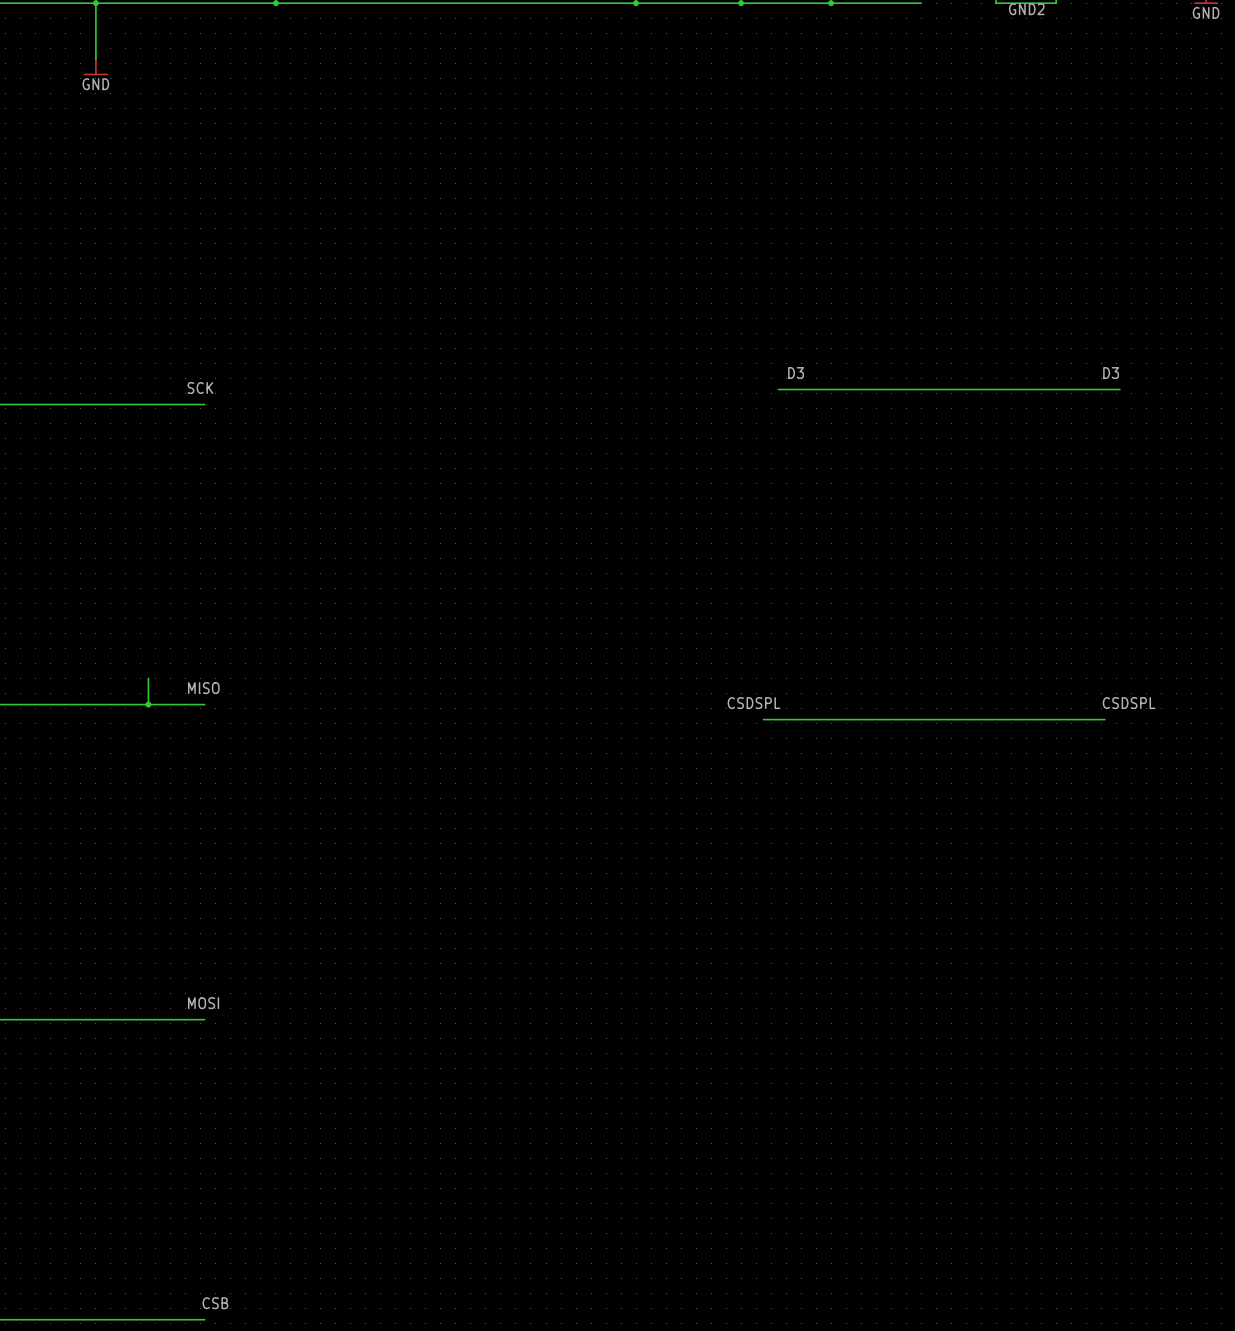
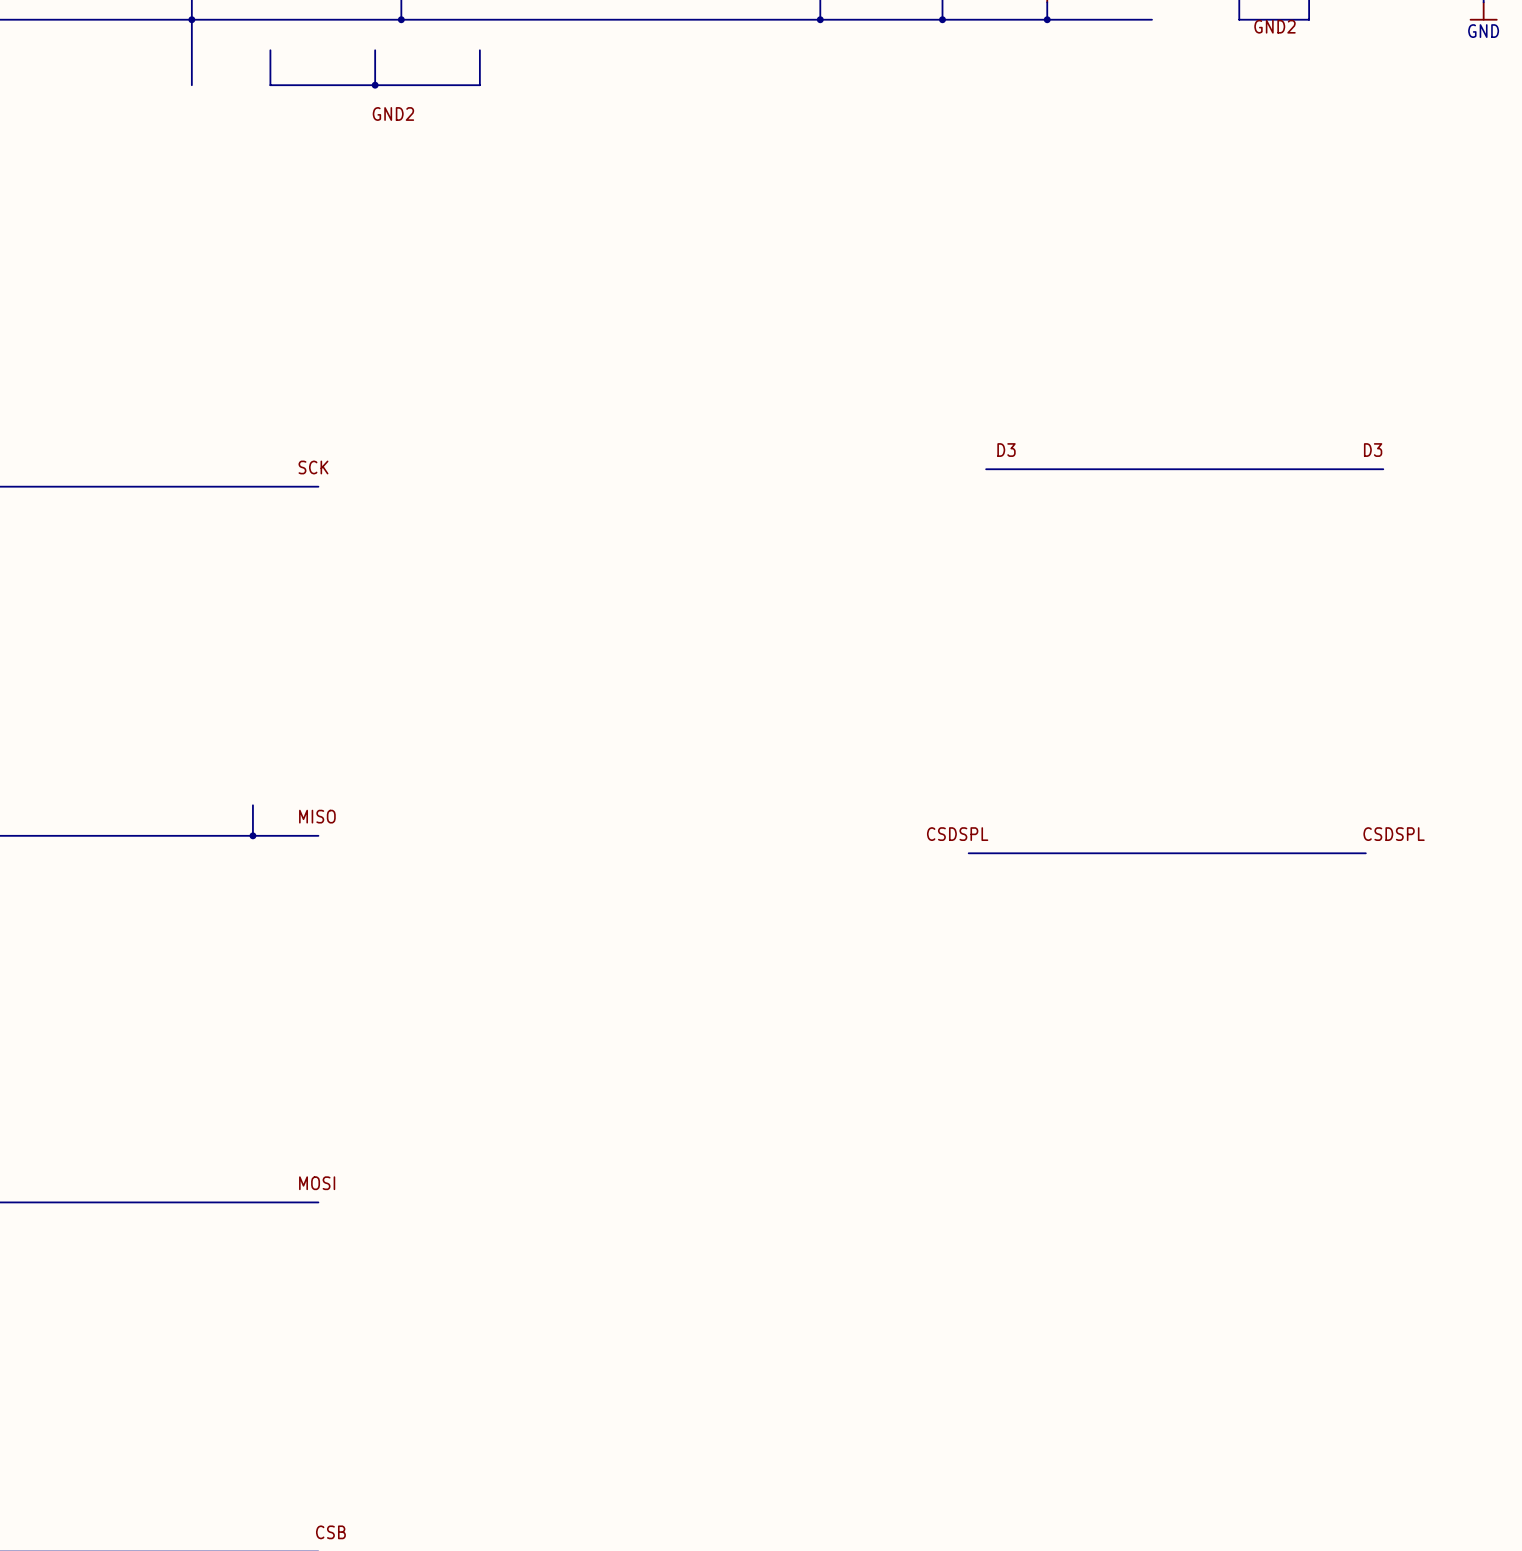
wire: none -> (270, 50) (270, 85) (479, 85) (479, 50)
wire: none -> (375, 50) (375, 85)
junction: none -> (375, 85)
power symbol: GND (95, 67) -> none
label: none -> GND2 (393, 113)

